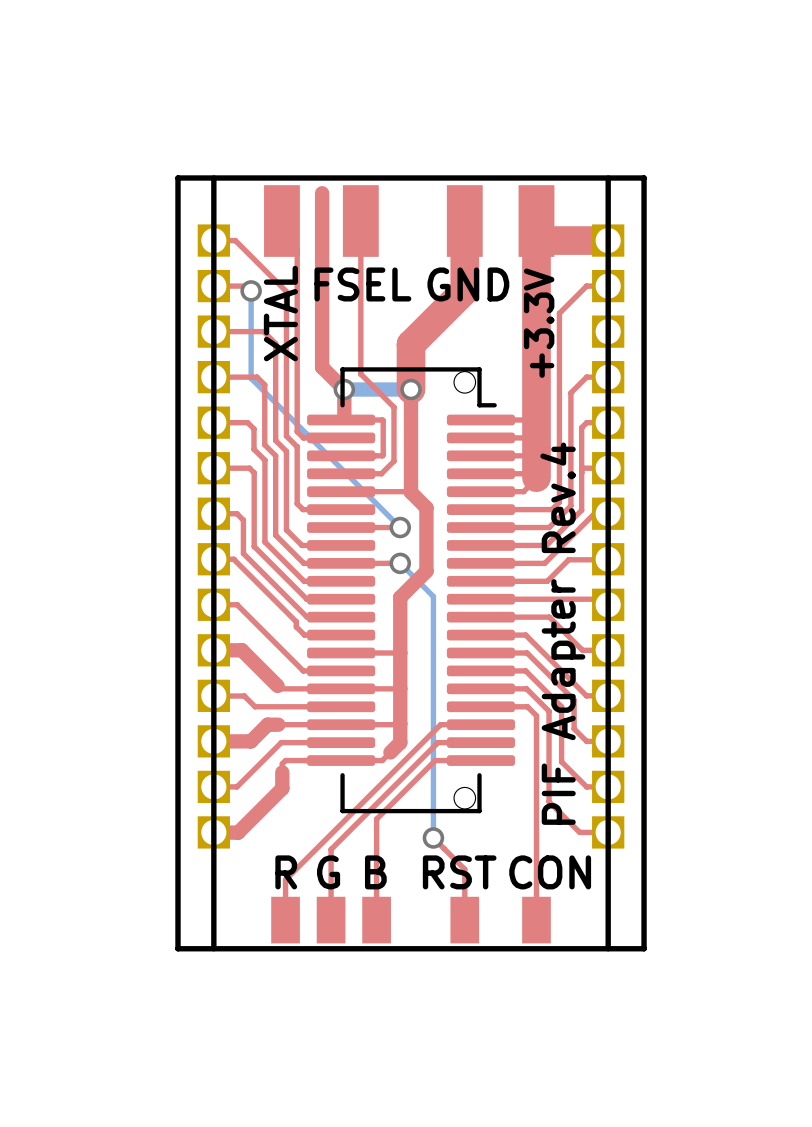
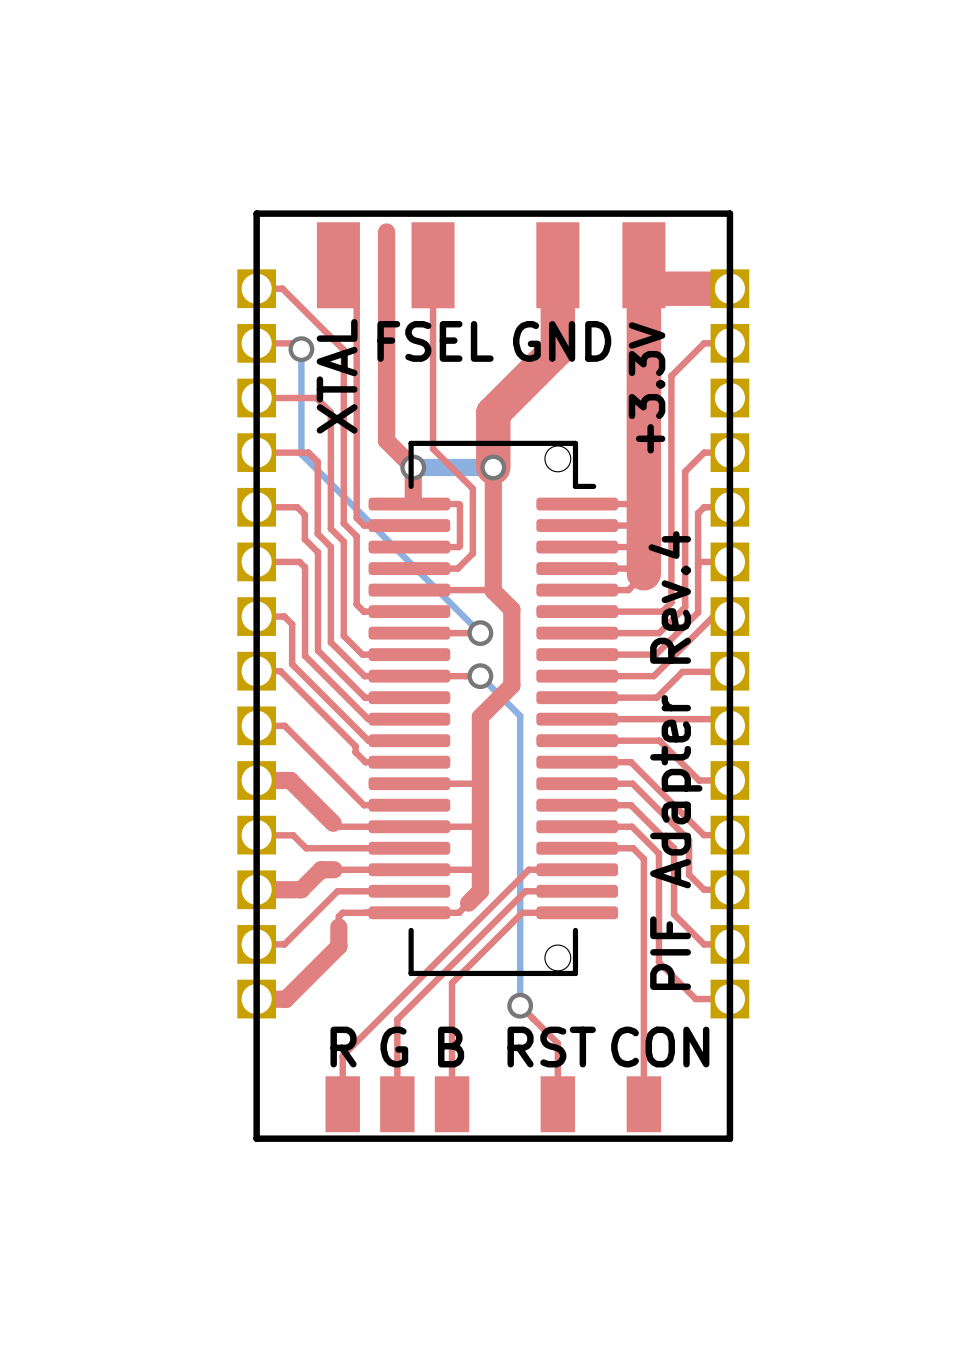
line: (213, 178) (213, 948) -> none
board edge: (213, 178) (178, 178) (178, 948) (213, 948) -> (256, 213) (256, 1138)
line: (608, 178) (608, 948) -> none
board edge: (608, 178) (644, 178) (644, 948) (608, 948) -> (729, 213) (729, 1138)

